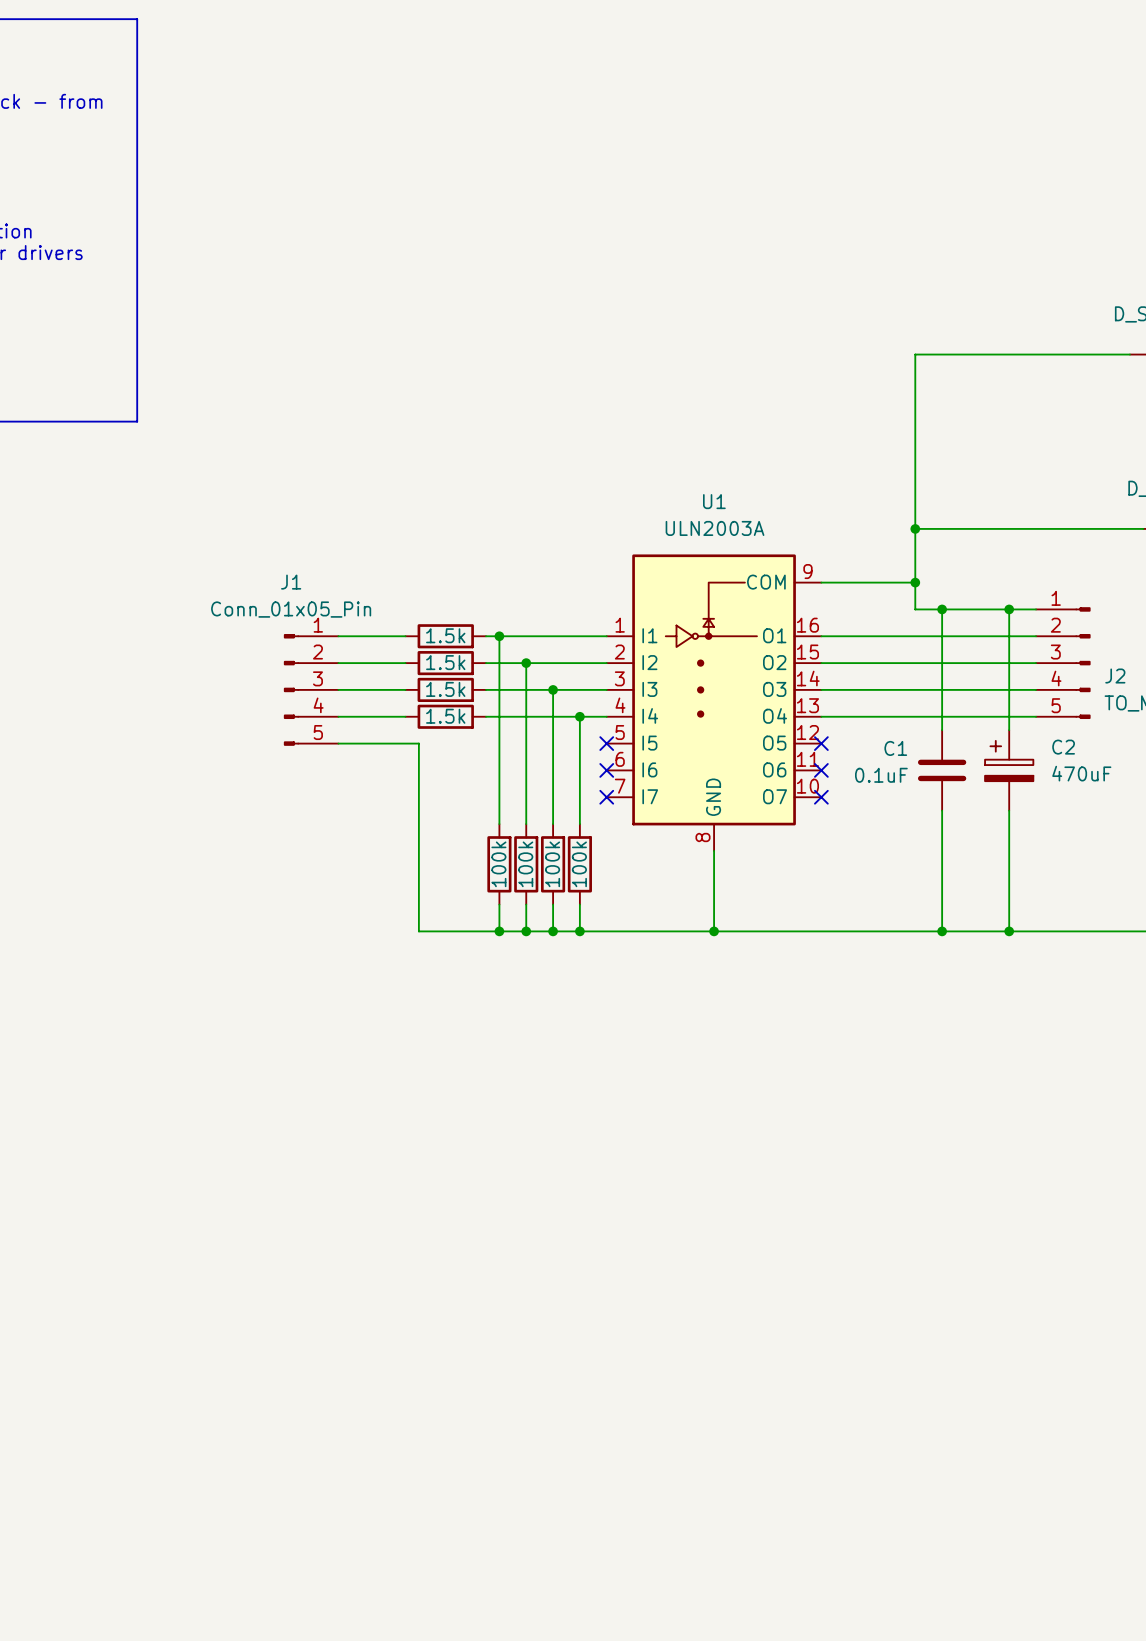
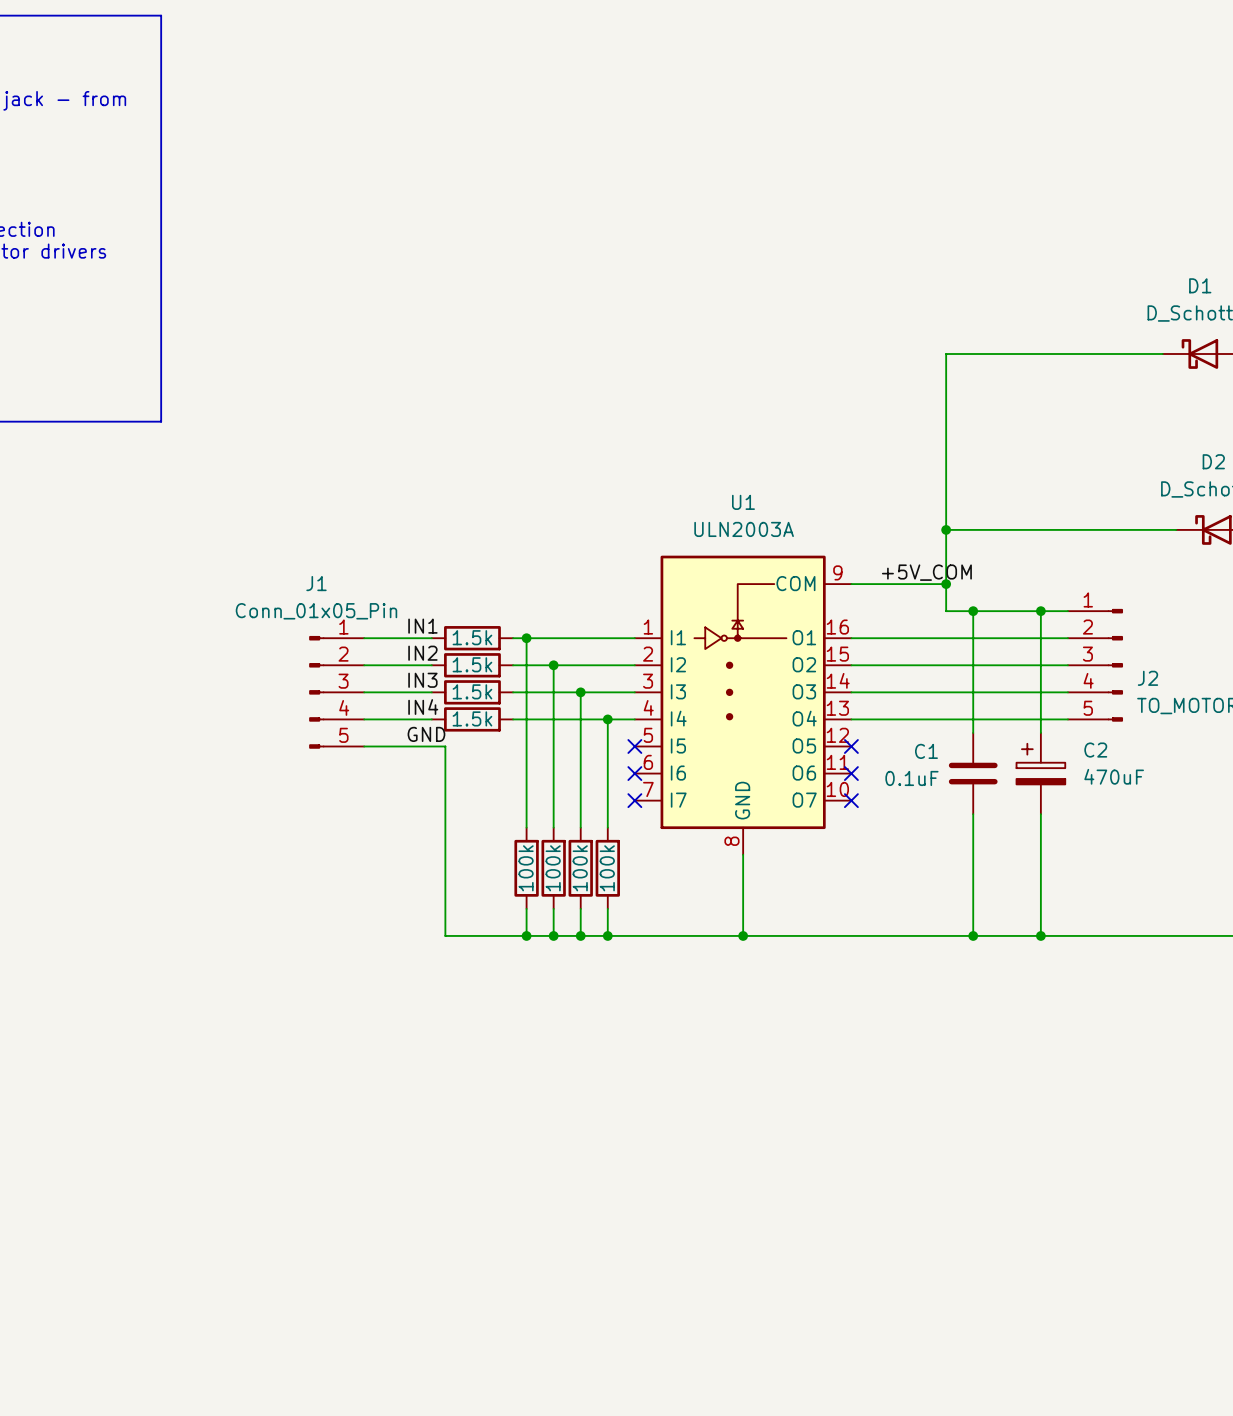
label: none -> +5V_COM (926, 572)
label: none -> IN1 (422, 626)
label: none -> IN2 (422, 653)
label: none -> IN3 (422, 680)
label: none -> IN4 (423, 707)
label: none -> GND (426, 734)

